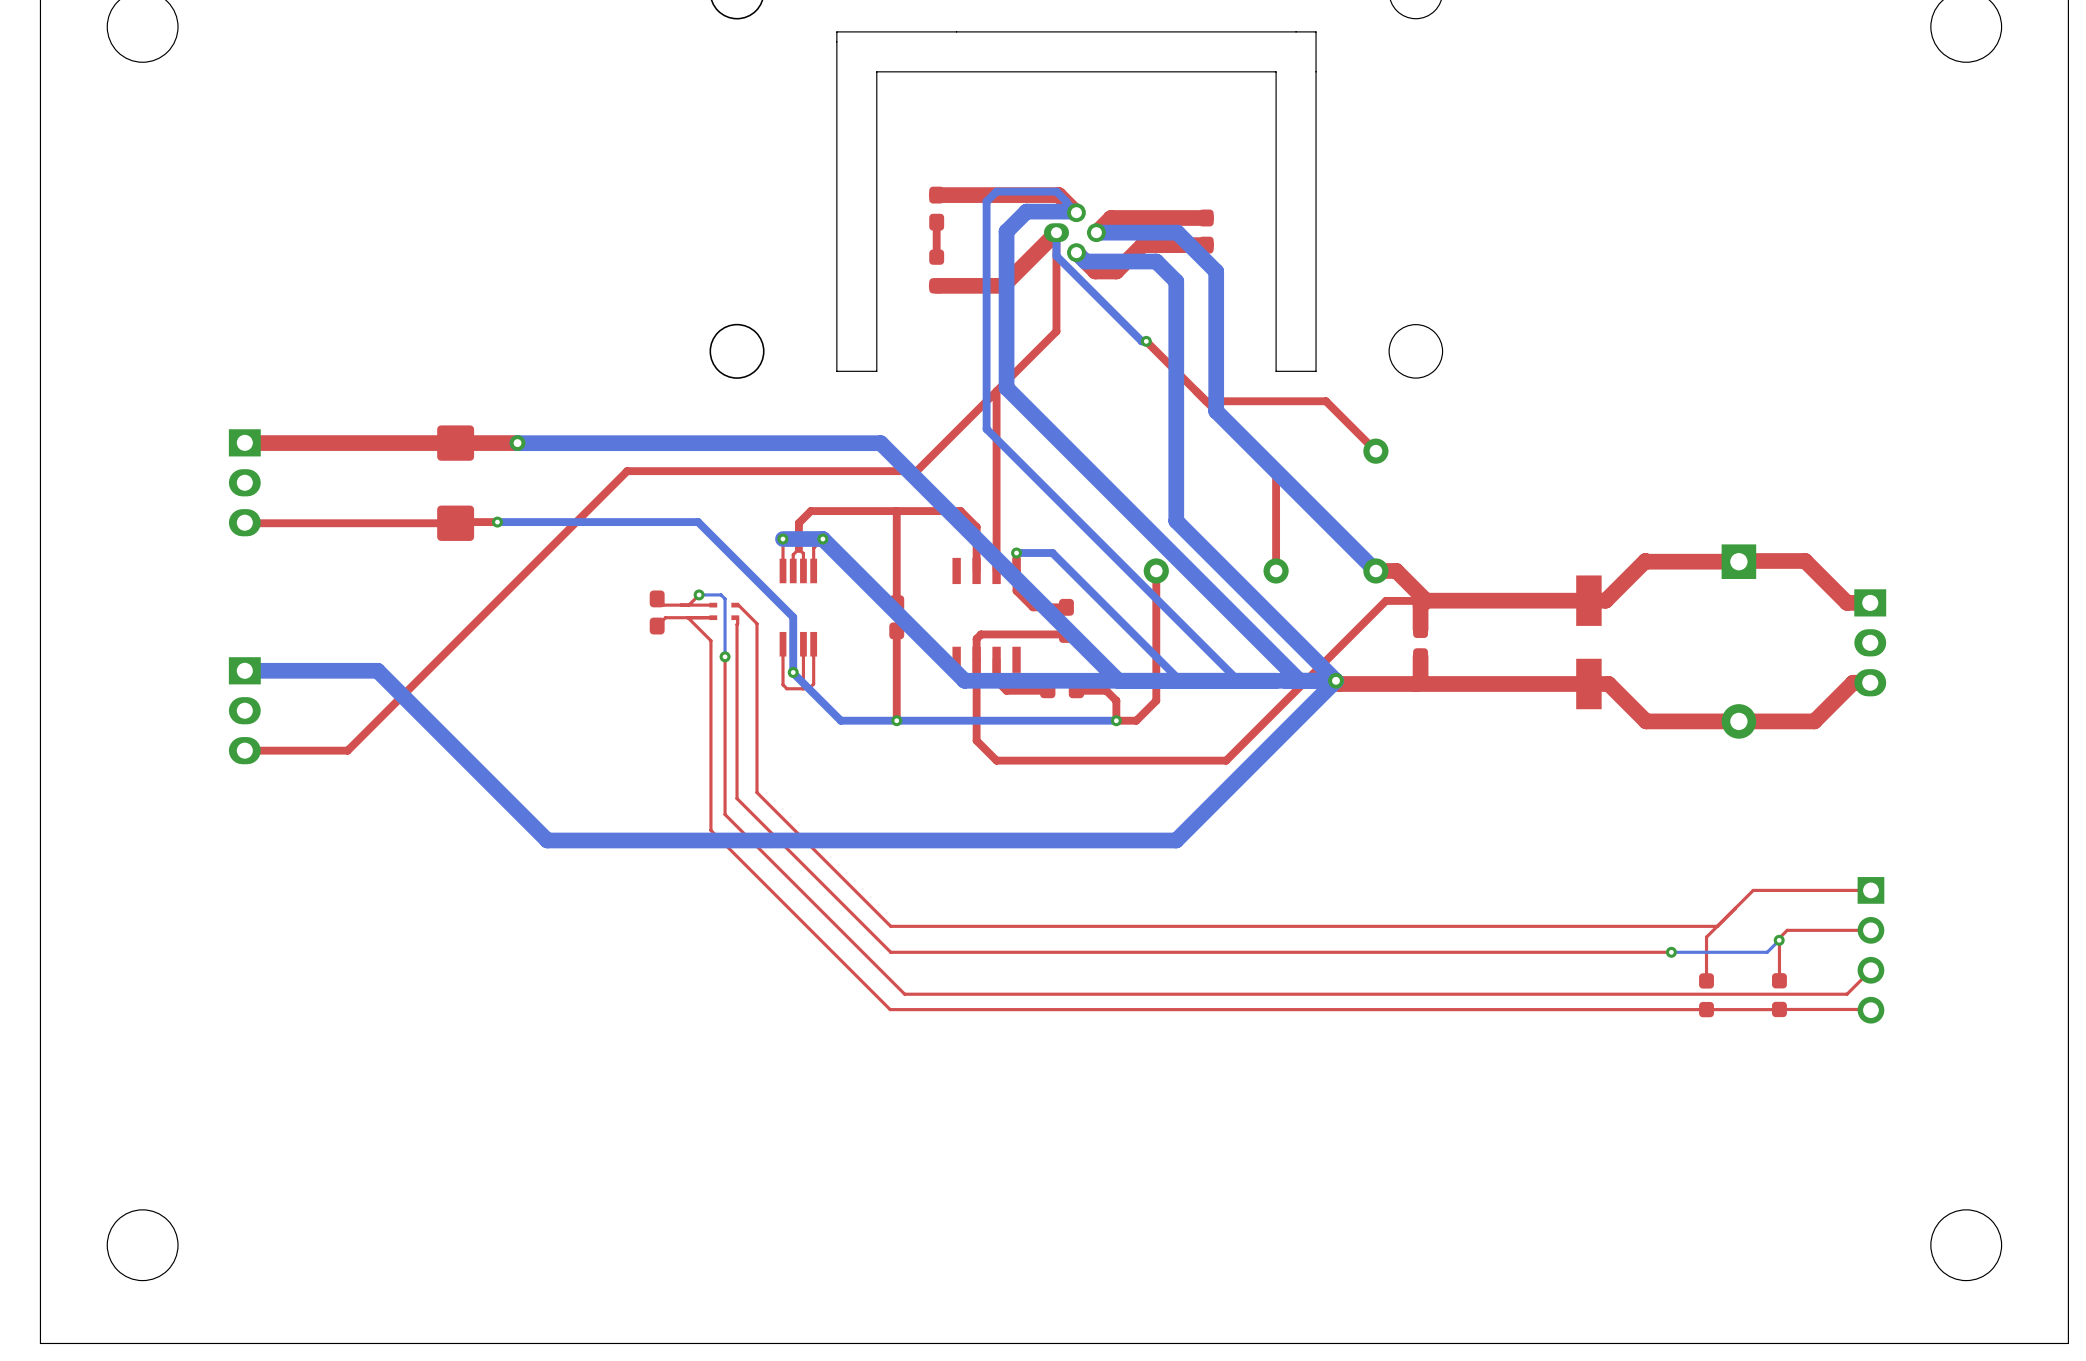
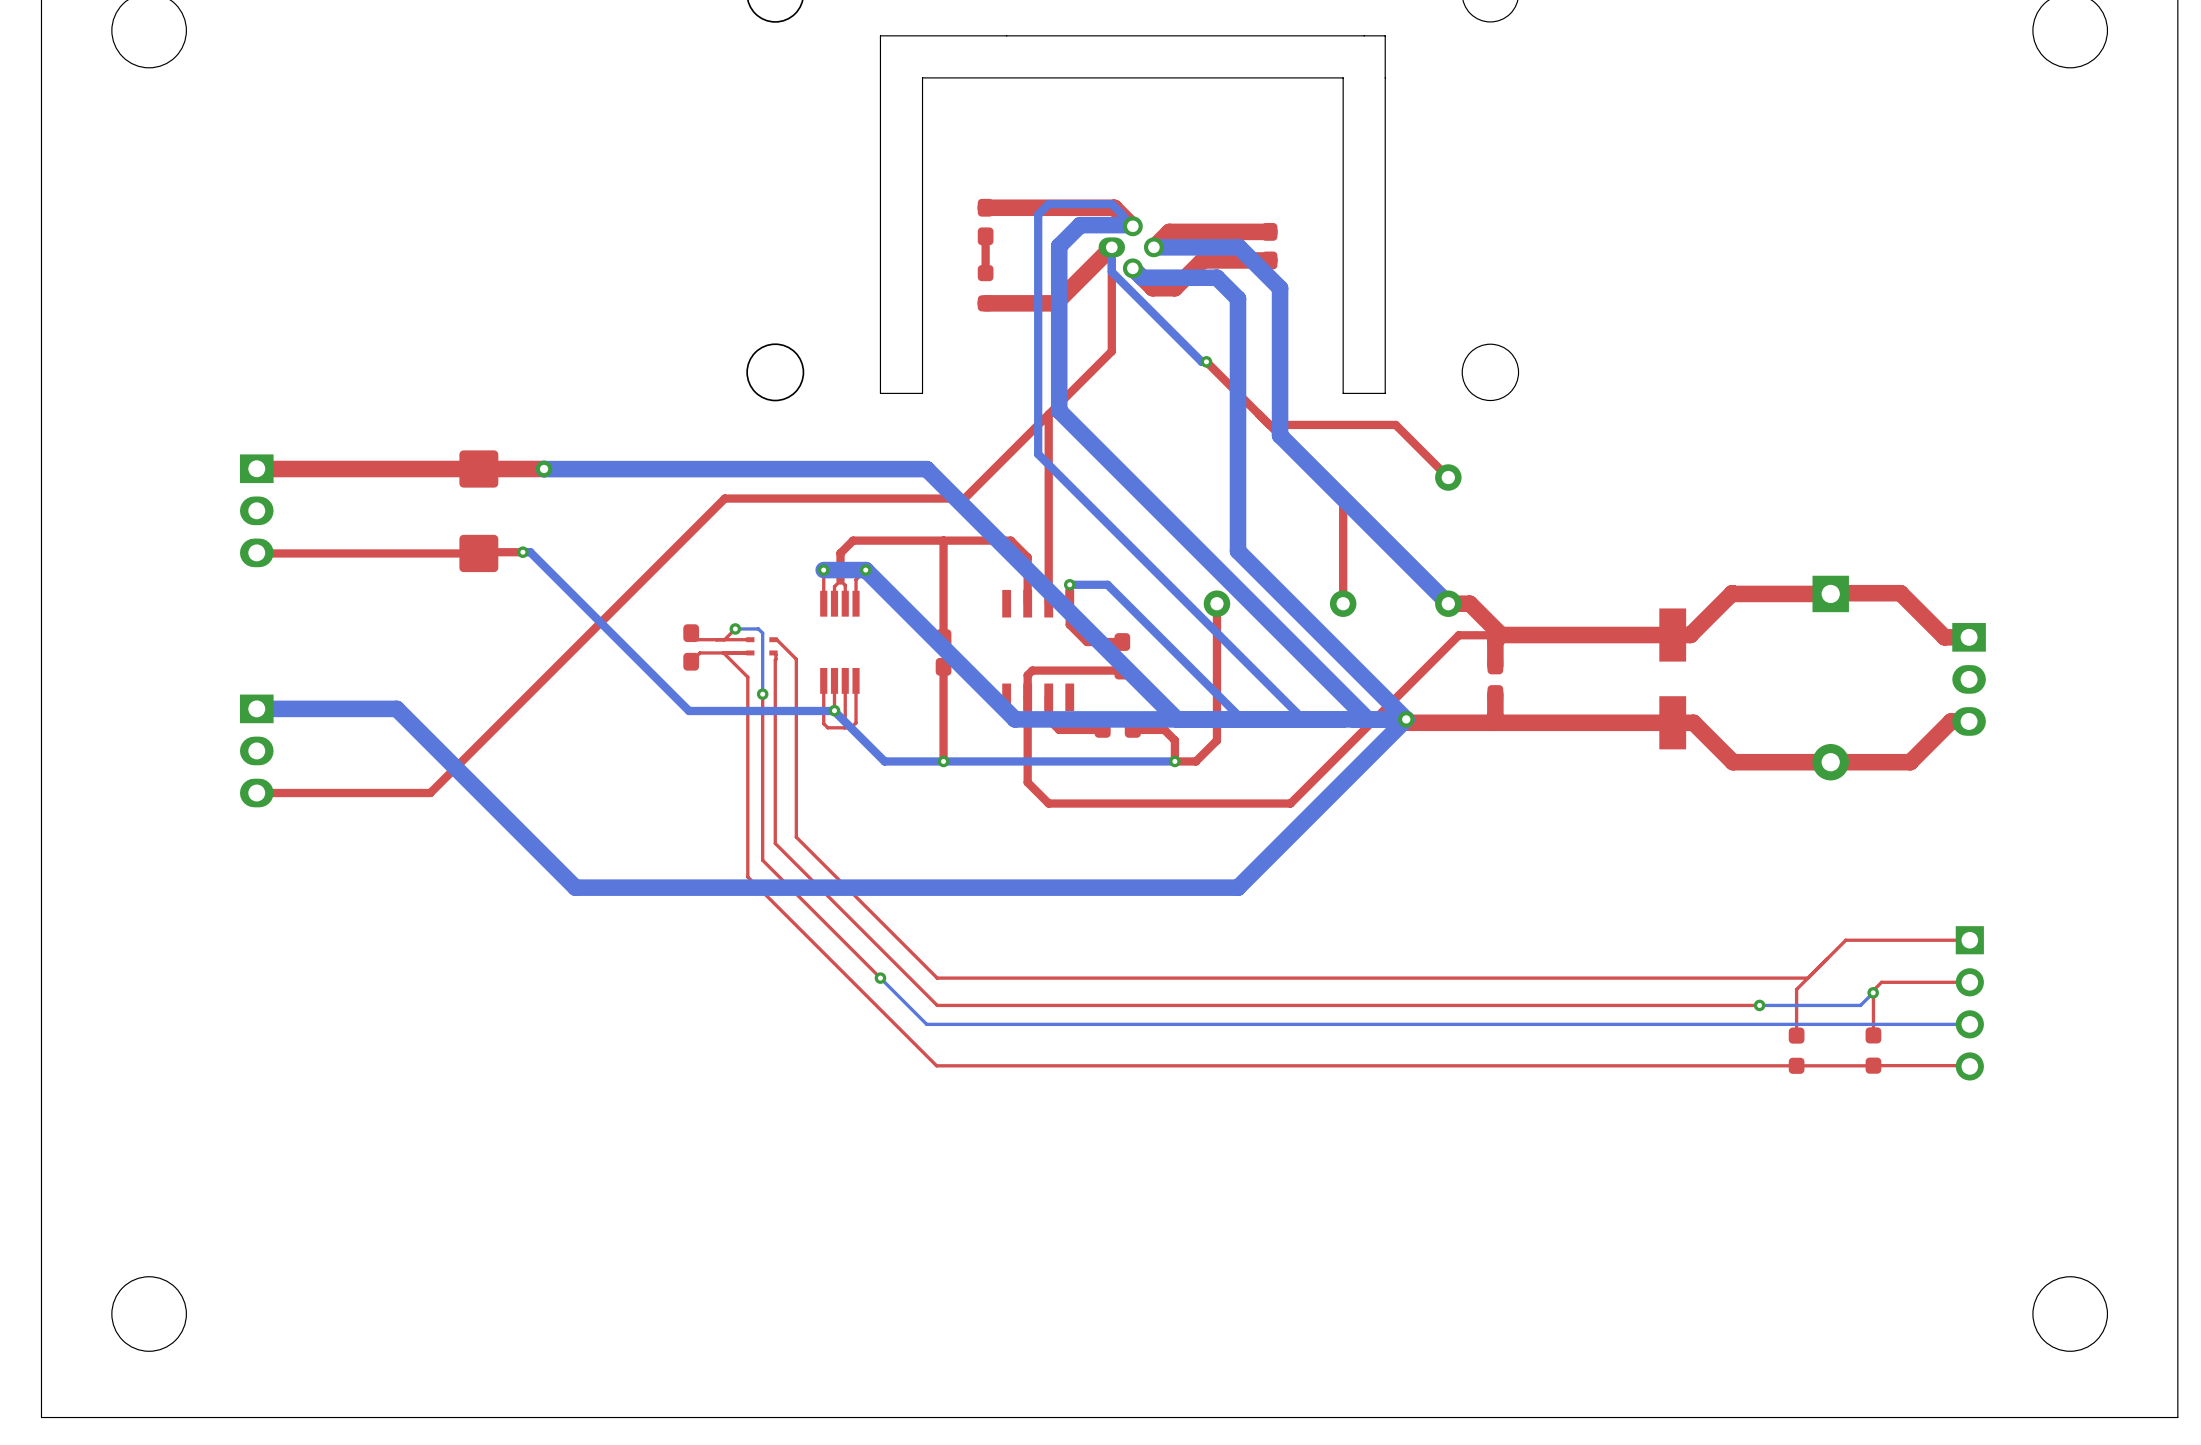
top track: (689, 471) (627, 471) (347, 750) -> (724, 498) (430, 793) (365, 793)
bottom track: (504, 522) (698, 522) (793, 617) (793, 672) -> (530, 552) (689, 710) (834, 710)
top track: (836, 926) (904, 994) (1847, 994) (1870, 970) -> none
bottom track: none -> (880, 978) (926, 1024) (1969, 1024)
via: none -> (880, 978)

